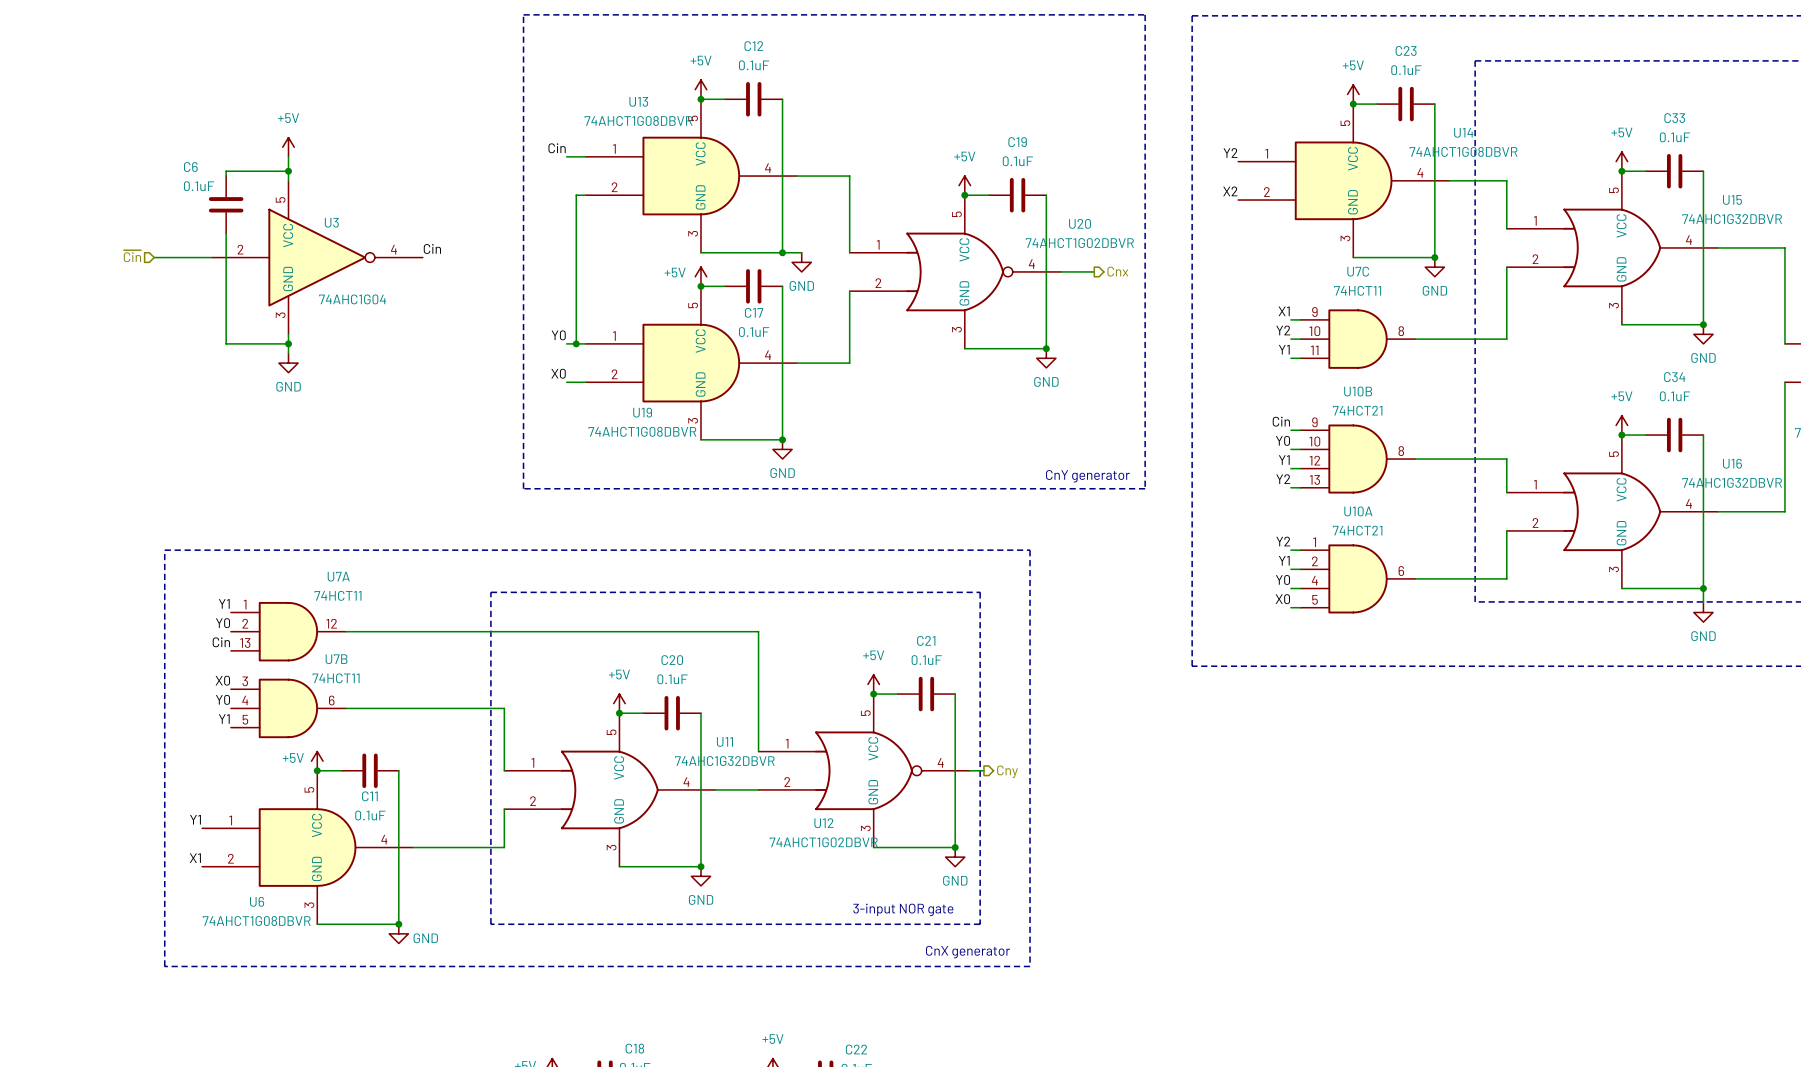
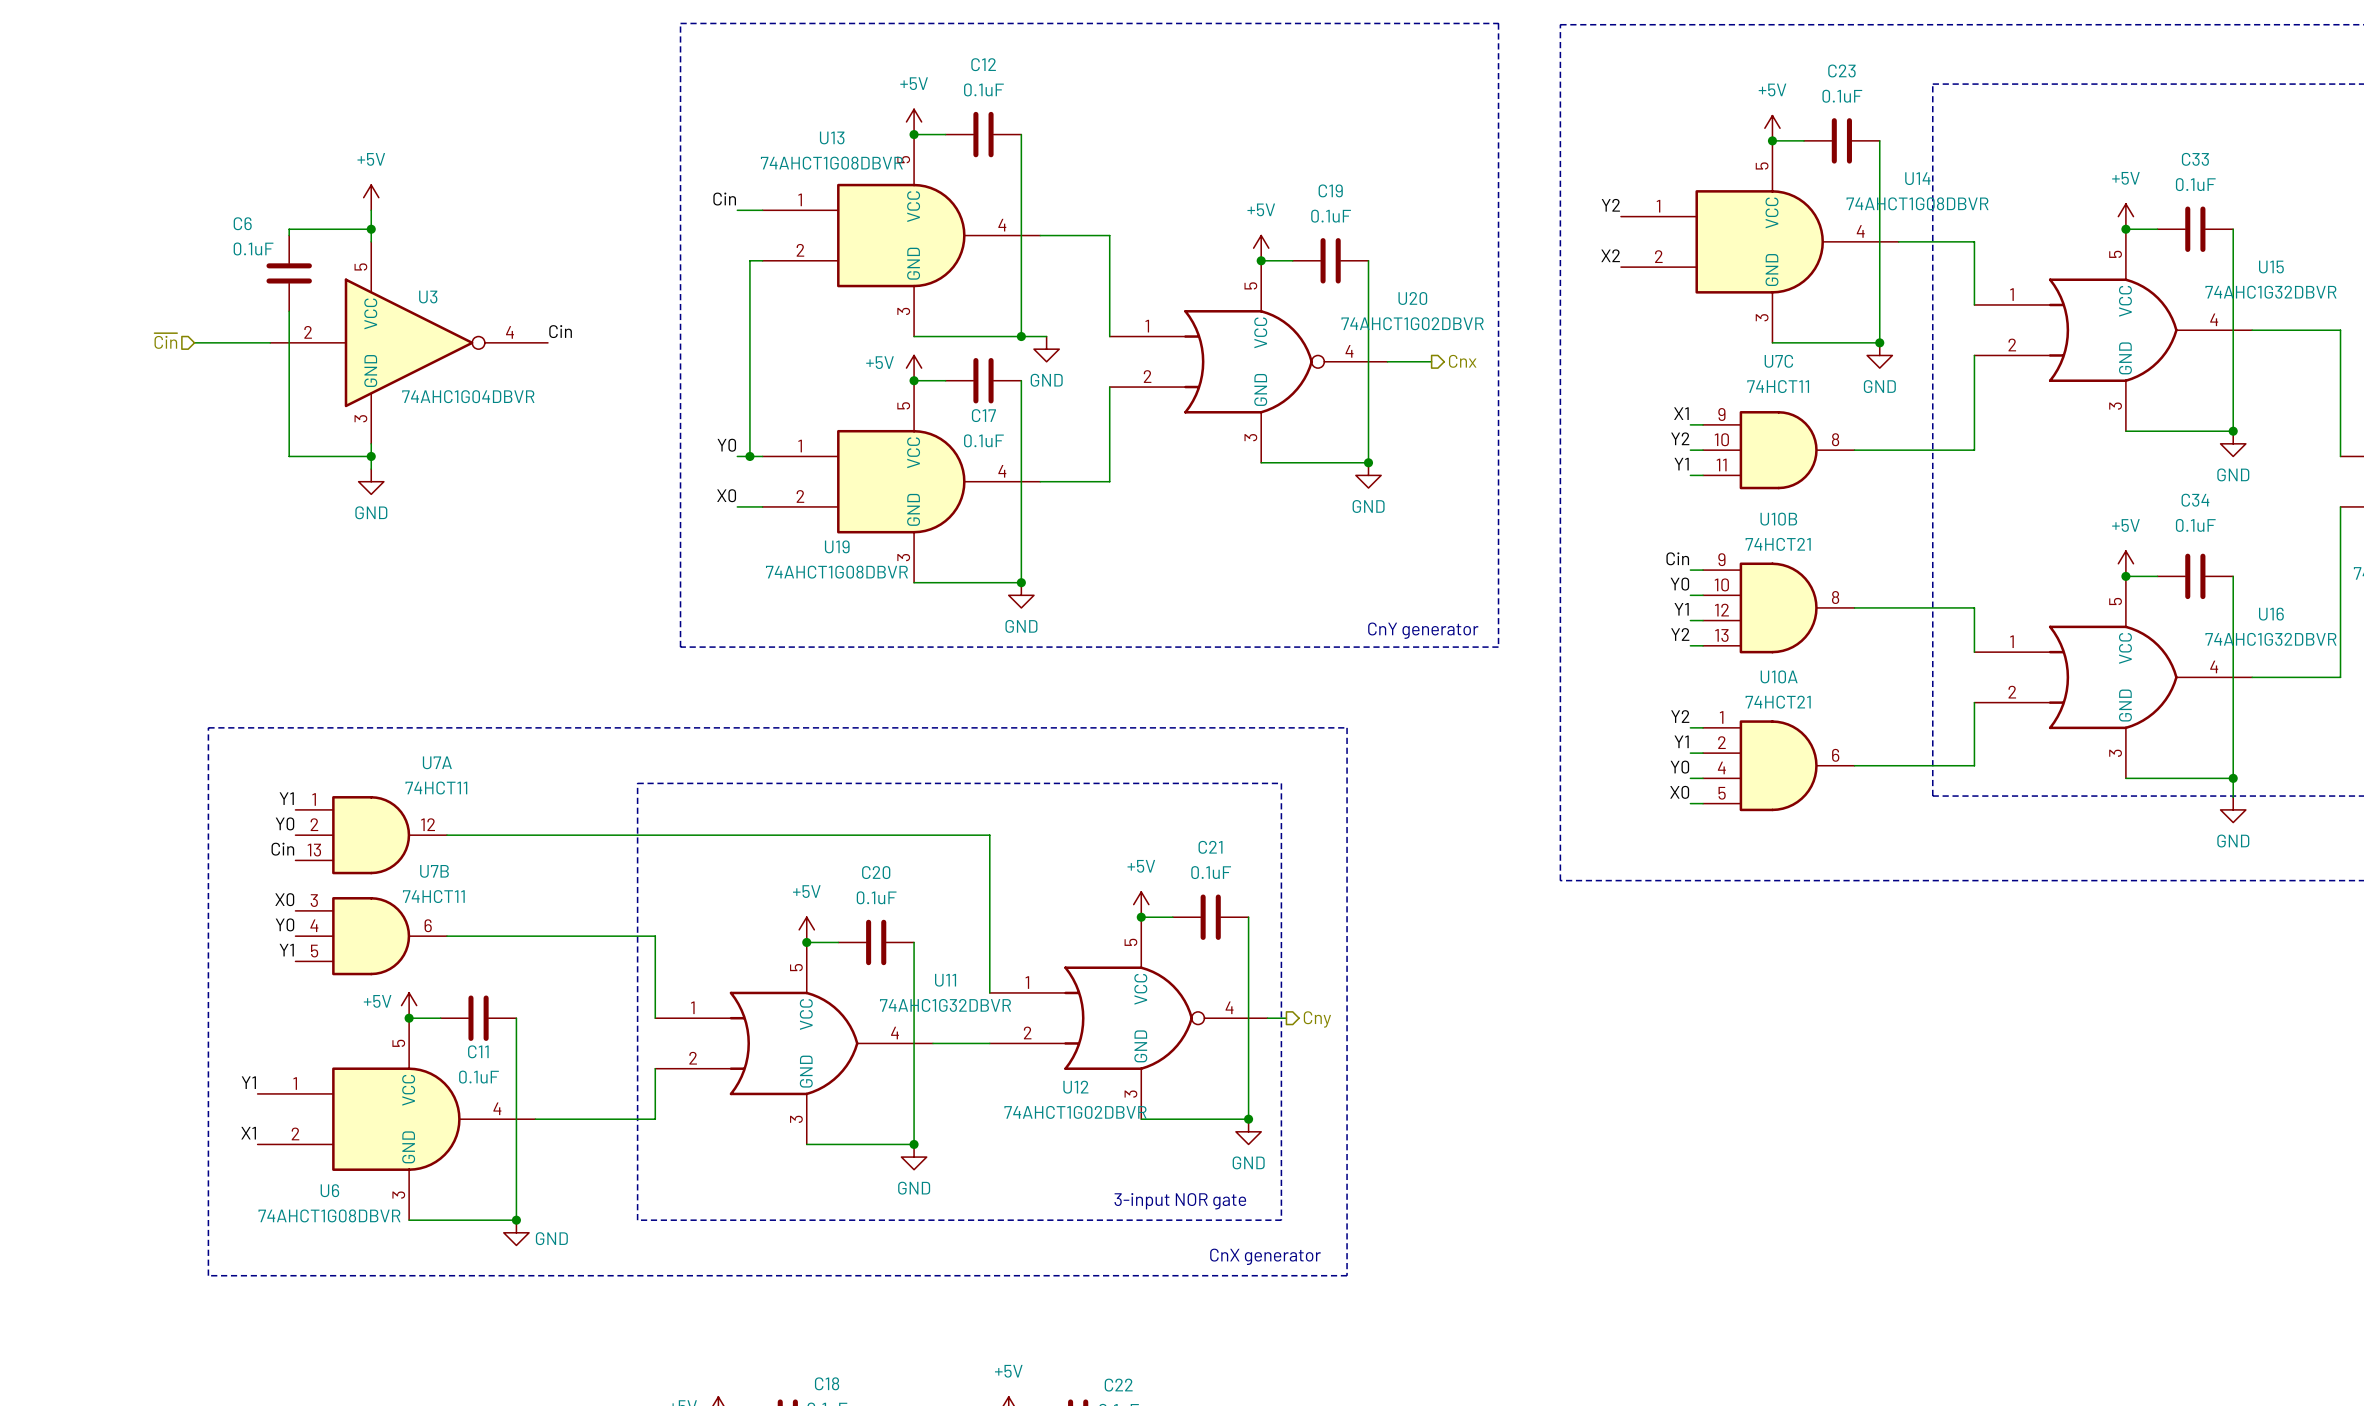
U3 value: 74AHC1G04 (352, 299) -> 74AHC1G04DBVR (468, 396)

